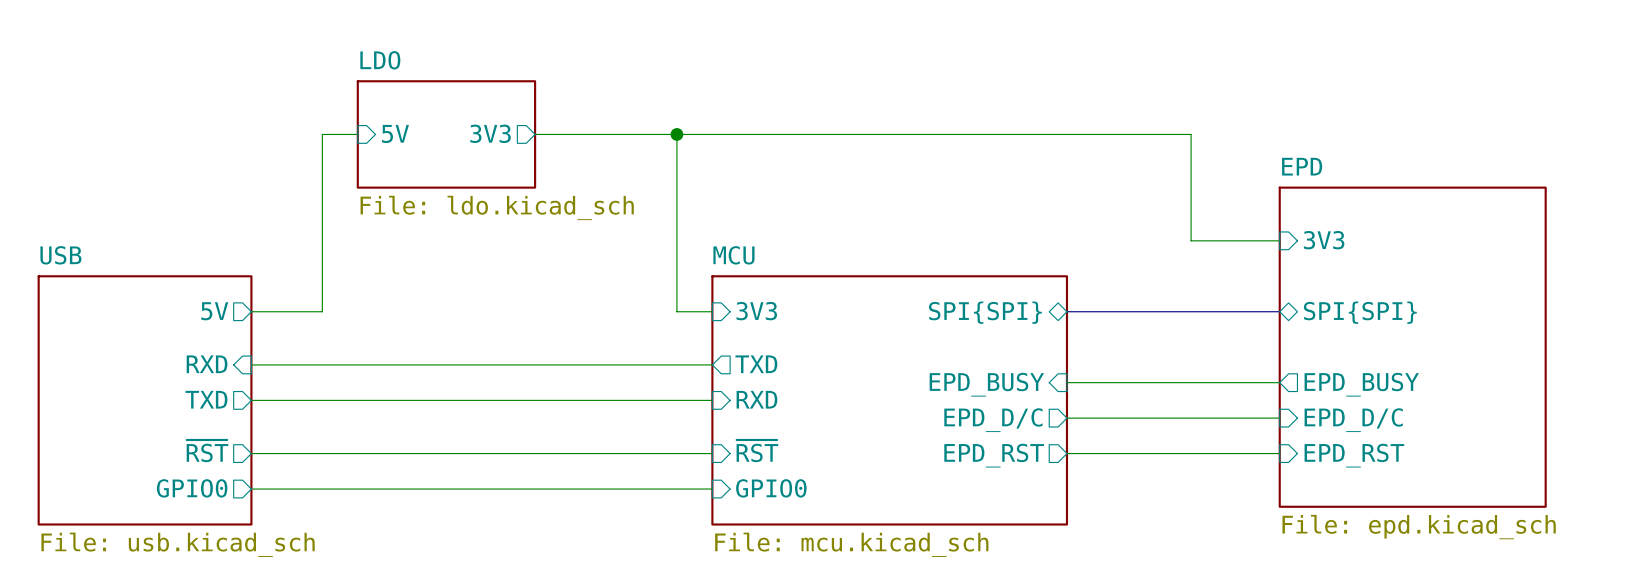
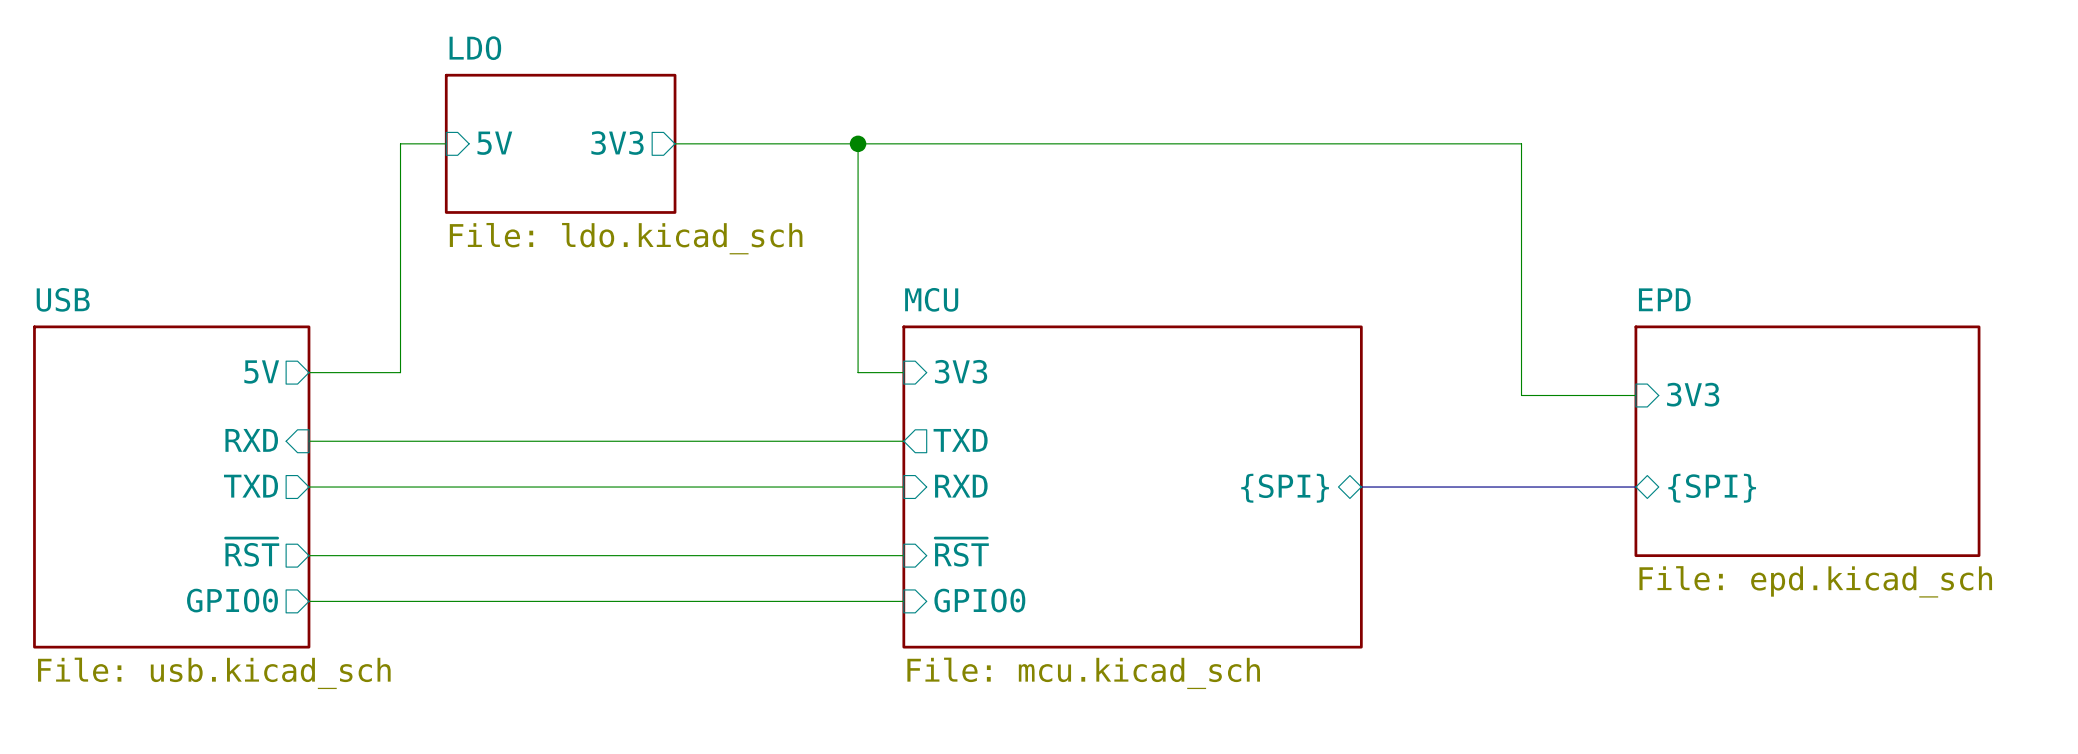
wire: (1191, 240) (1279, 240) -> (1521, 281) (1521, 395) (1635, 395)
sheet pin position: 3V3 (1324, 240) -> 3V3 (1693, 394)
bus: (1066, 311) (1279, 311) -> (1361, 487) (1635, 487)
sheet pin: SPI{SPI} (985, 312) -> none
sheet pin: SPI{SPI} (1360, 312) -> none
sheet EPD: File: epd.kicad_sch (1412, 347) -> none
sheet EPD: none -> File: epd.kicad_sch (1807, 441)
wire: (1066, 382) (1279, 382) -> none
sheet pin: EPD_BUSY (986, 384) -> none
sheet pin: EPD_BUSY (1361, 384) -> none
sheet pin: none -> {SPI} (1285, 488)
sheet pin: none -> {SPI} (1712, 488)
wire: (1066, 418) (1279, 418) -> none
sheet pin: EPD_D/C (993, 420) -> none
sheet pin: EPD_D/C (1353, 420) -> none
wire: (1066, 453) (1279, 453) -> none
sheet pin: EPD_RST (994, 455) -> none
sheet pin: EPD_RST (1354, 455) -> none

